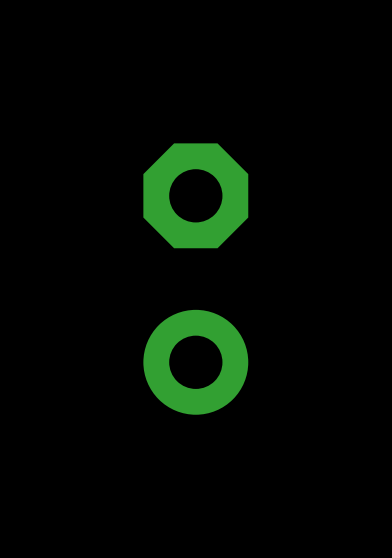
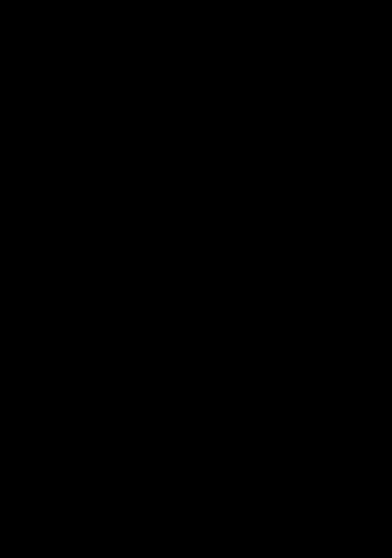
part: (195, 279) -> none

